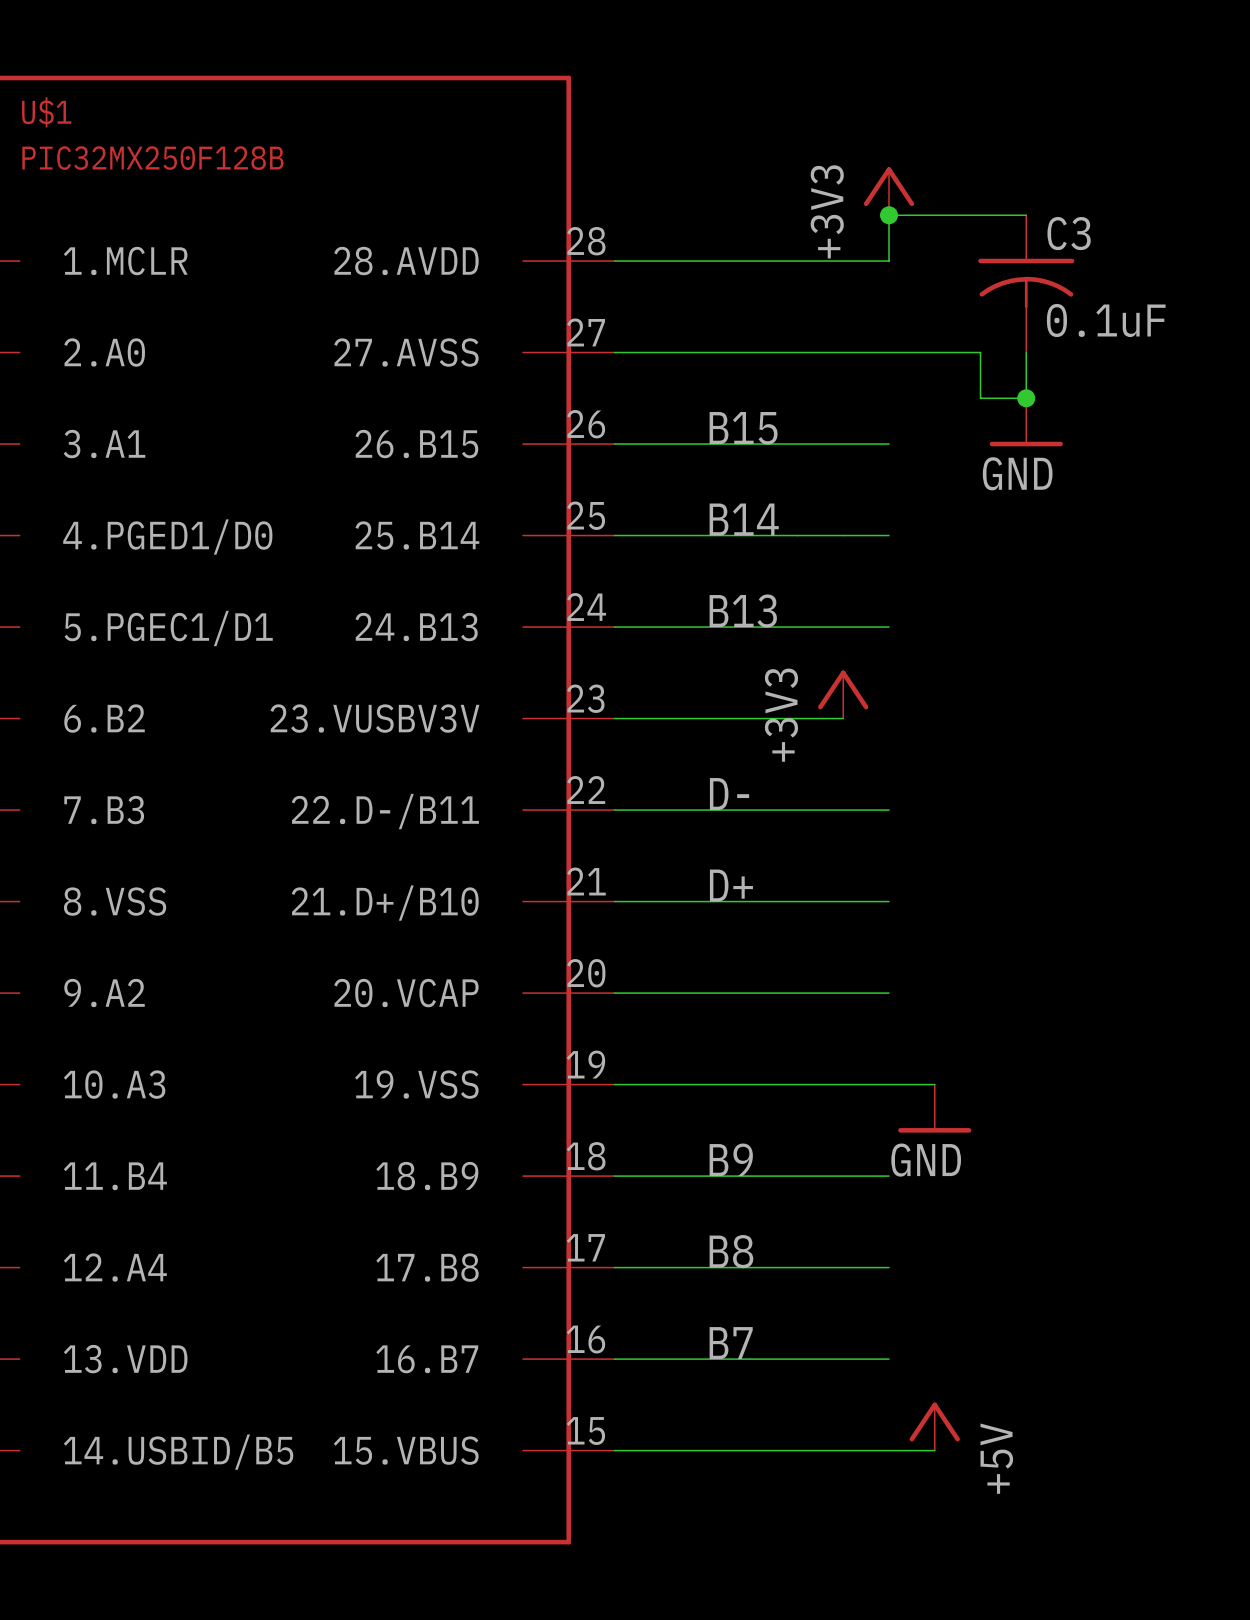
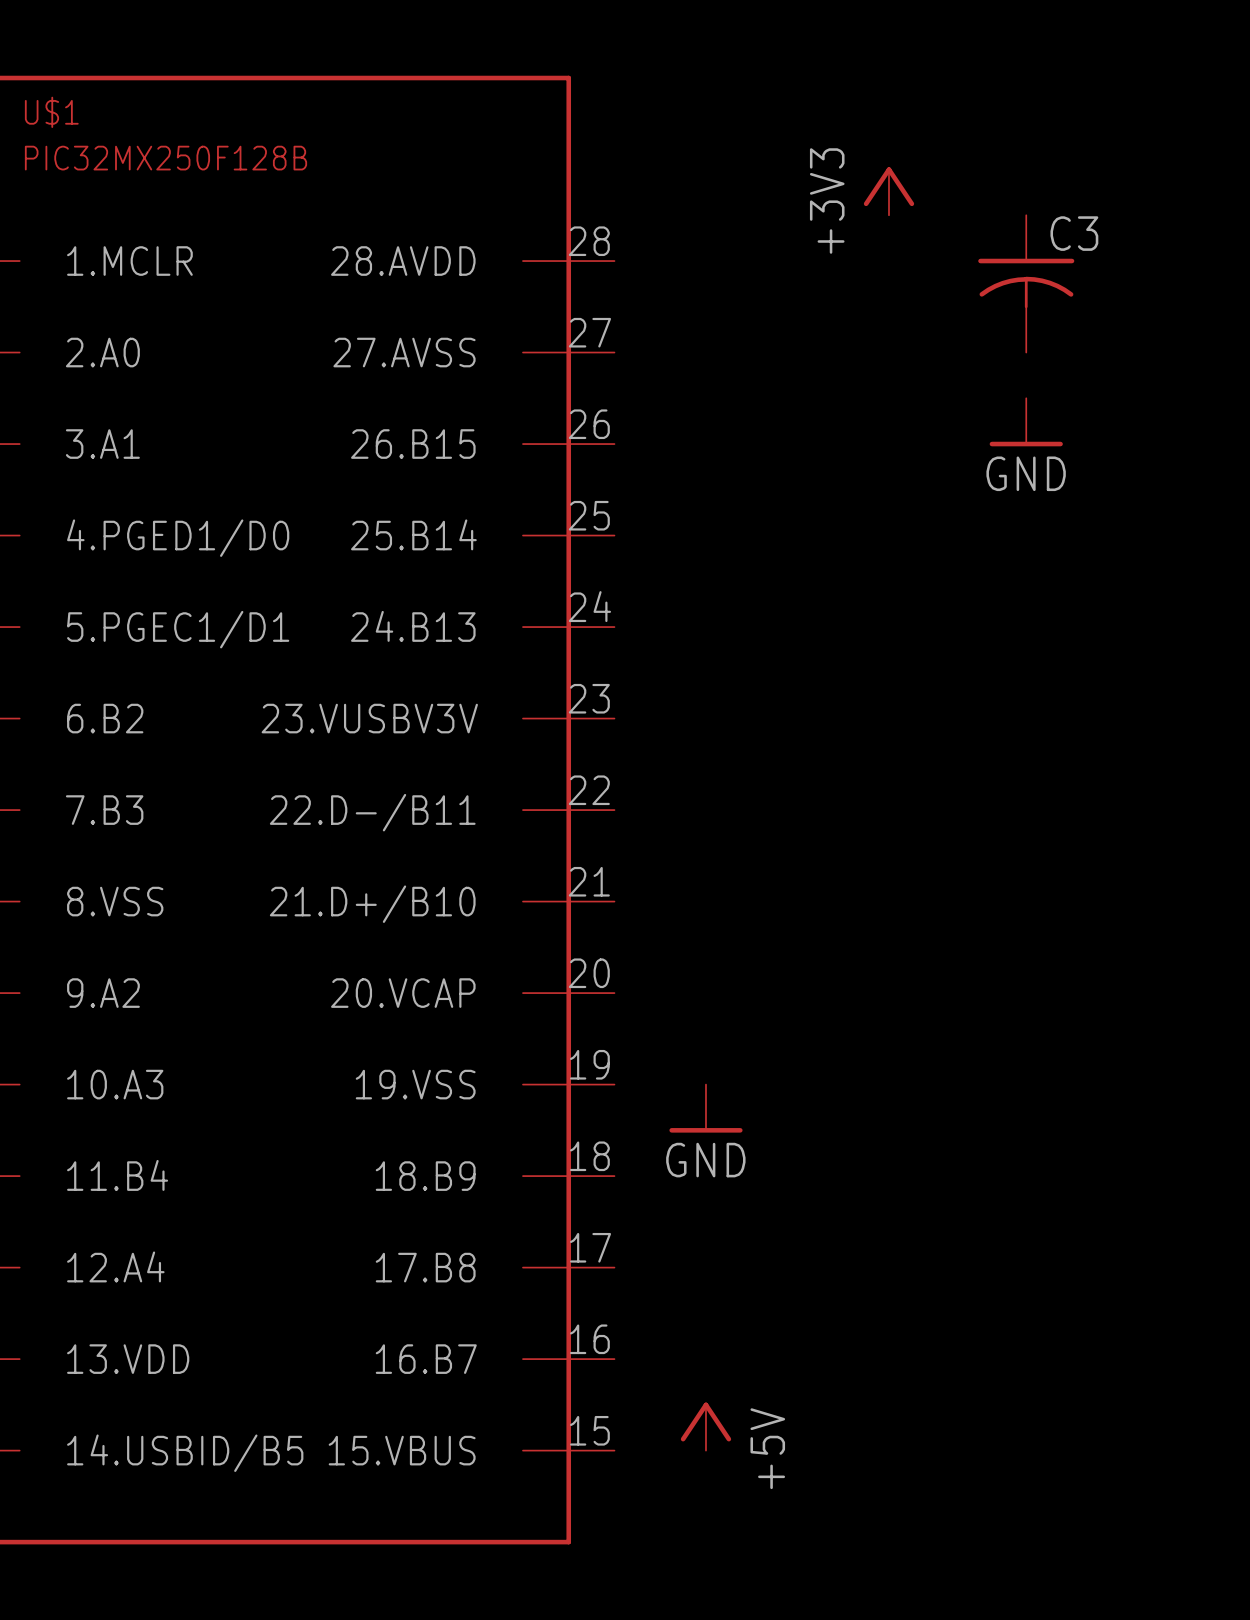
junction: (889, 215) -> none
wire: (1026, 215) (889, 215) (889, 261) (614, 261) -> none
C3 value: 0.1uF (1106, 320) -> none
wire: (614, 352) (980, 352) (980, 398) (1026, 398) (1026, 352) -> none
junction: (1026, 398) -> none
label: B15 (743, 428) -> none
wire: (614, 444) (889, 444) -> none
label: B14 (744, 519) -> none
wire: (614, 535) (889, 535) -> none
label: B13 (743, 611) -> none
wire: (614, 627) (889, 627) -> none
power symbol: +3V3 (843, 694) -> none
wire: (614, 718) (843, 718) -> none
label: D- (729, 794) -> none
wire: (614, 810) (889, 810) -> none
label: D+ (731, 885) -> none
wire: (614, 901) (889, 901) -> none
wire: (614, 993) (889, 993) -> none
wire: (614, 1084) (934, 1084) -> none
power symbol position: GND (934, 1108) -> GND (705, 1108)
label: B9 (731, 1159) -> none
wire: (614, 1176) (889, 1176) -> none
label: B8 (731, 1251) -> none
wire: (614, 1267) (889, 1267) -> none
label: B7 (731, 1343) -> none
wire: (614, 1359) (889, 1359) -> none
power symbol position: +5V (934, 1426) -> +5V (705, 1426)
wire: (614, 1450) (934, 1450) -> none

